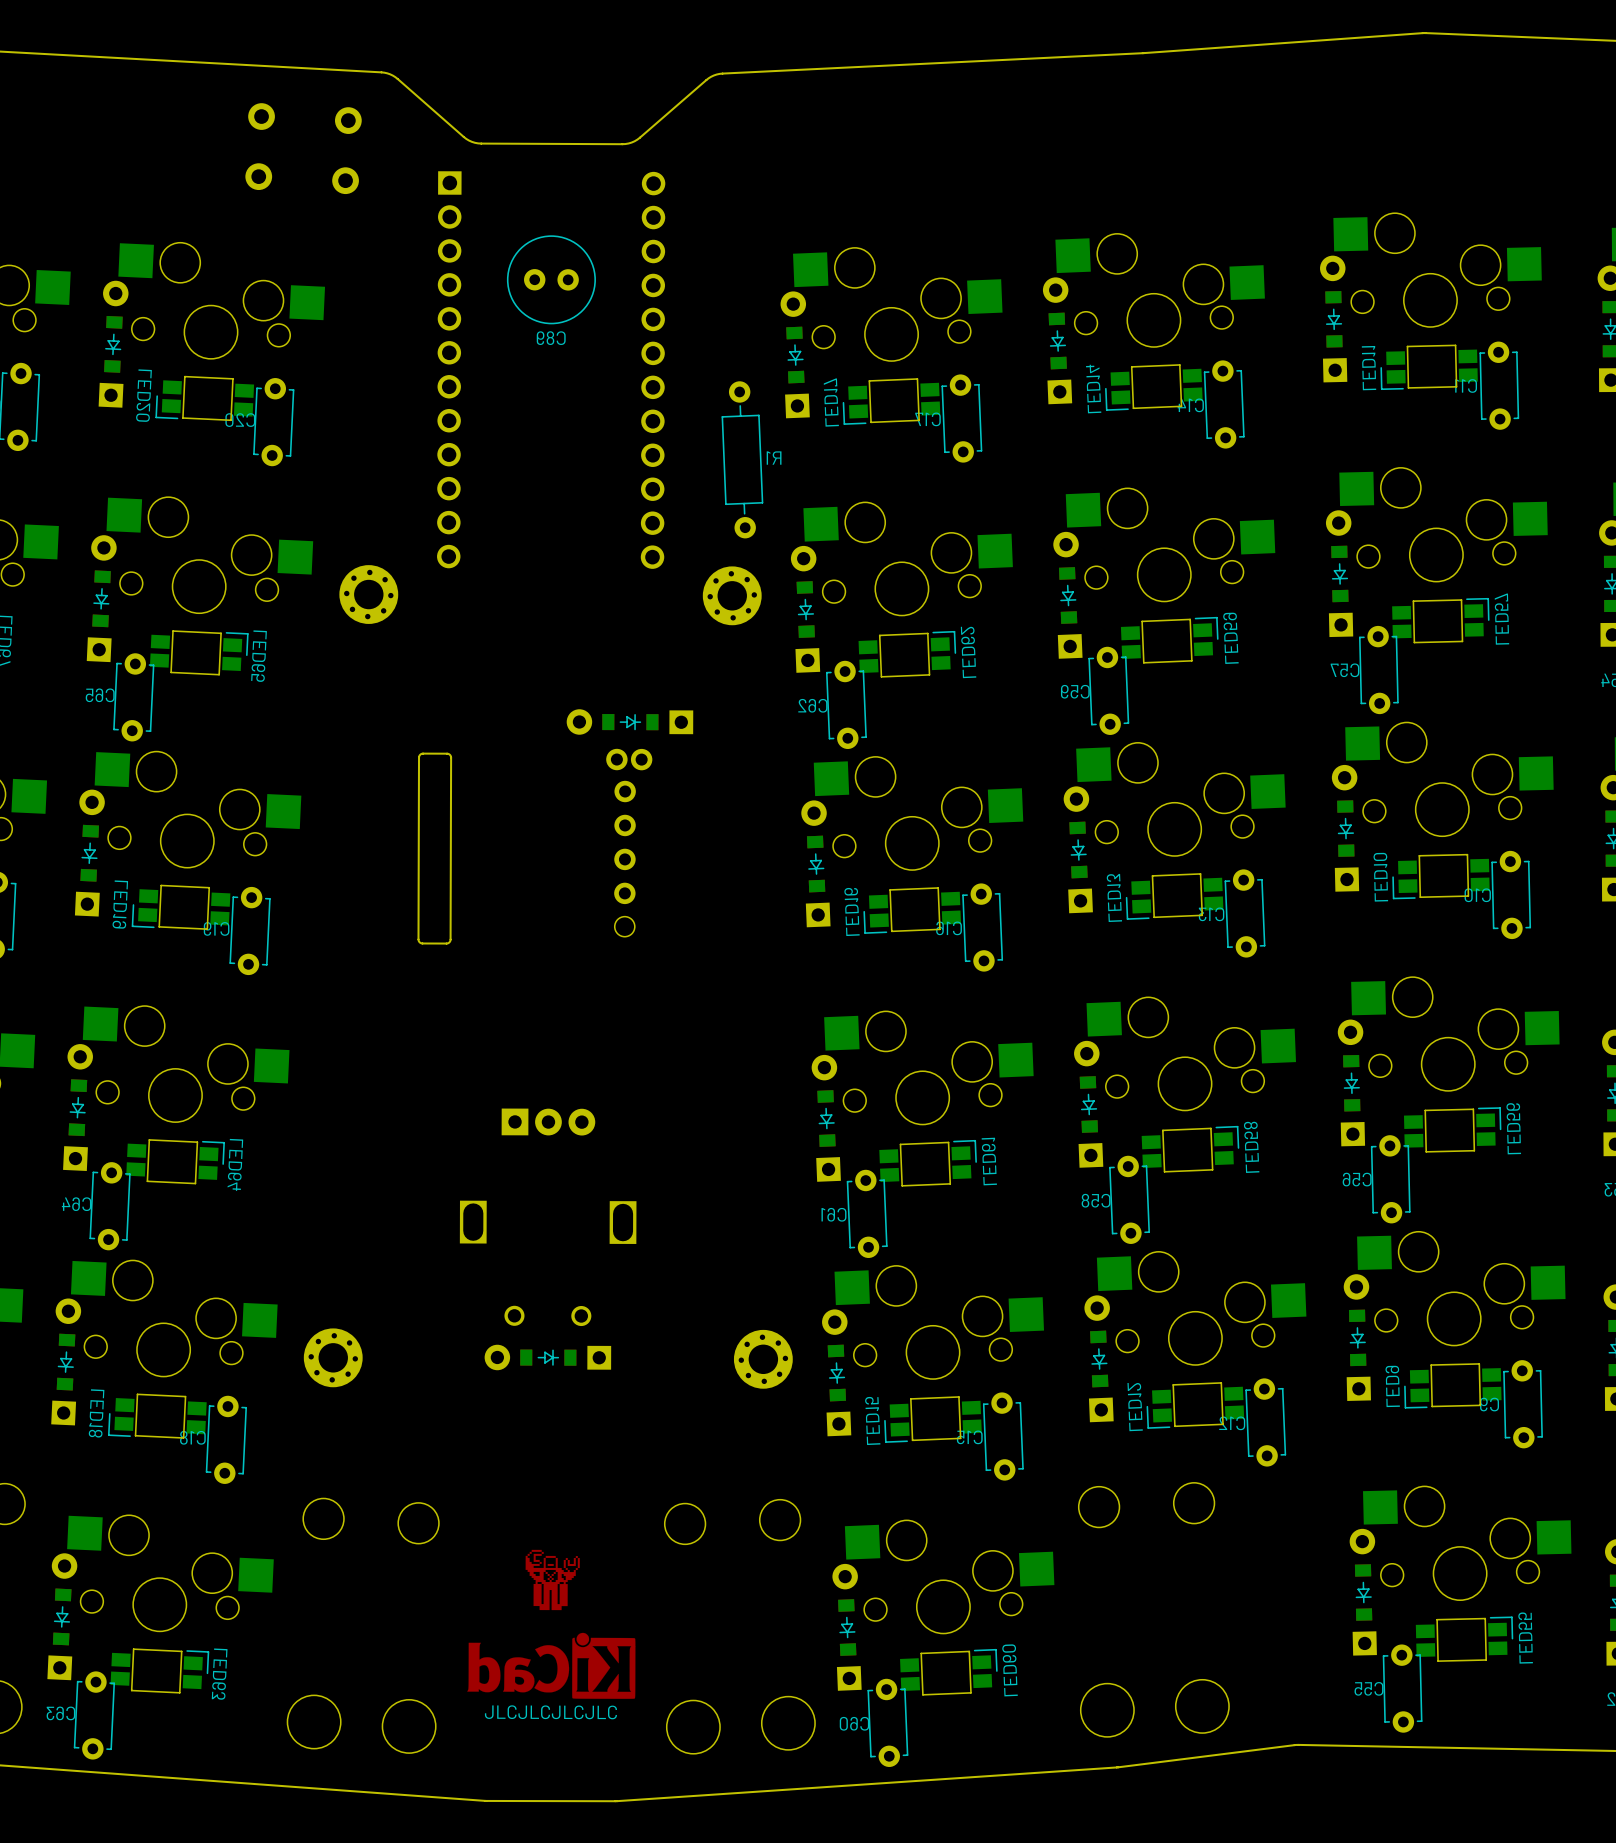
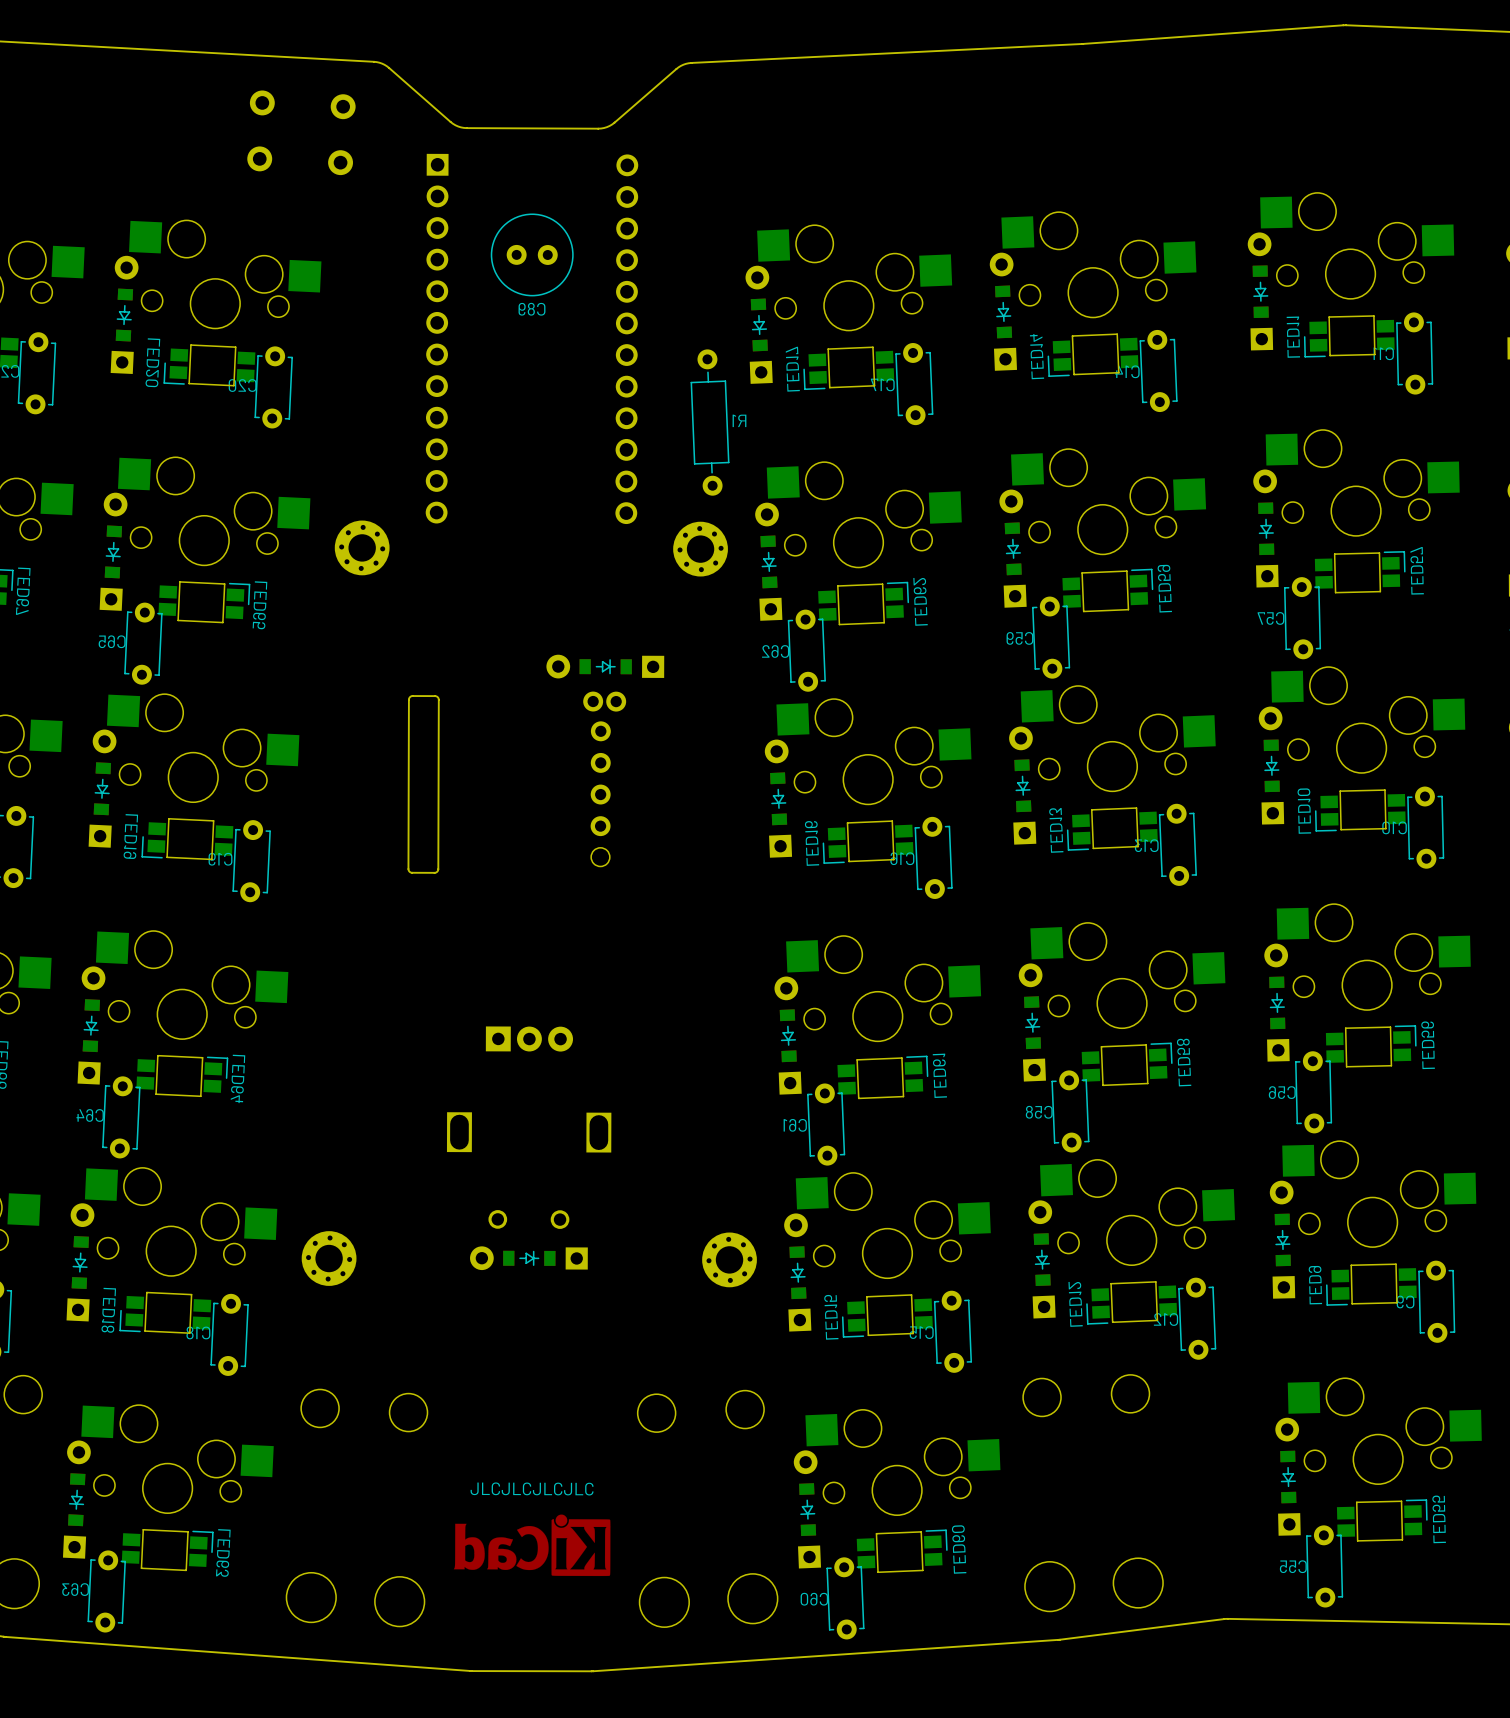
drawing: [525, 1549, 580, 1611] -> none
text position: JLCJLCJLCJLC (550, 1712) -> JLCJLCJLCJLC (532, 1488)

